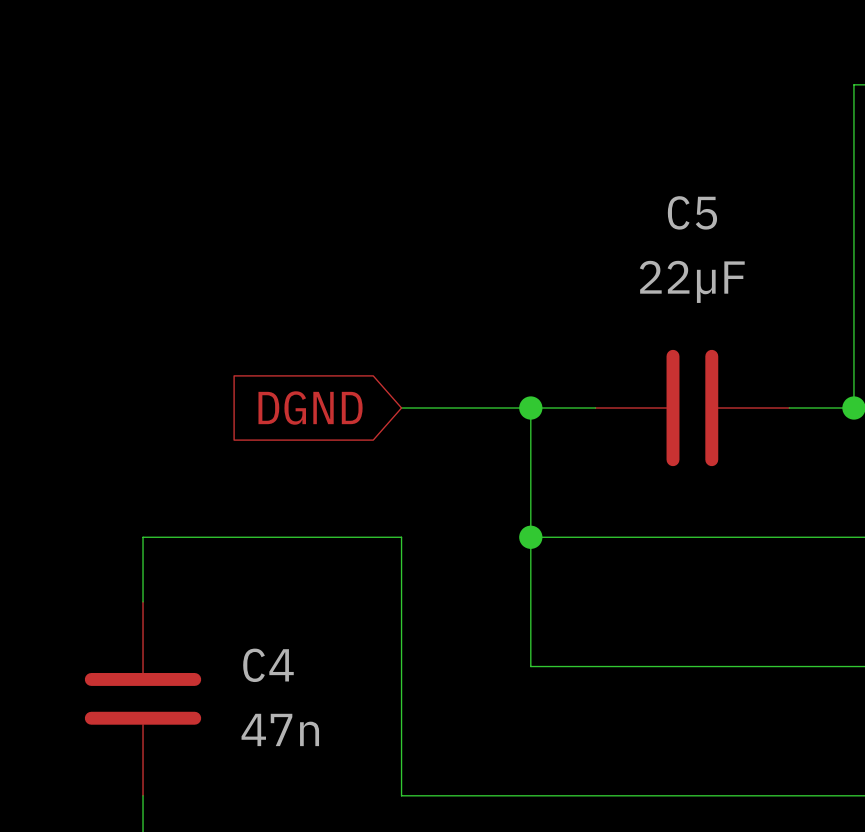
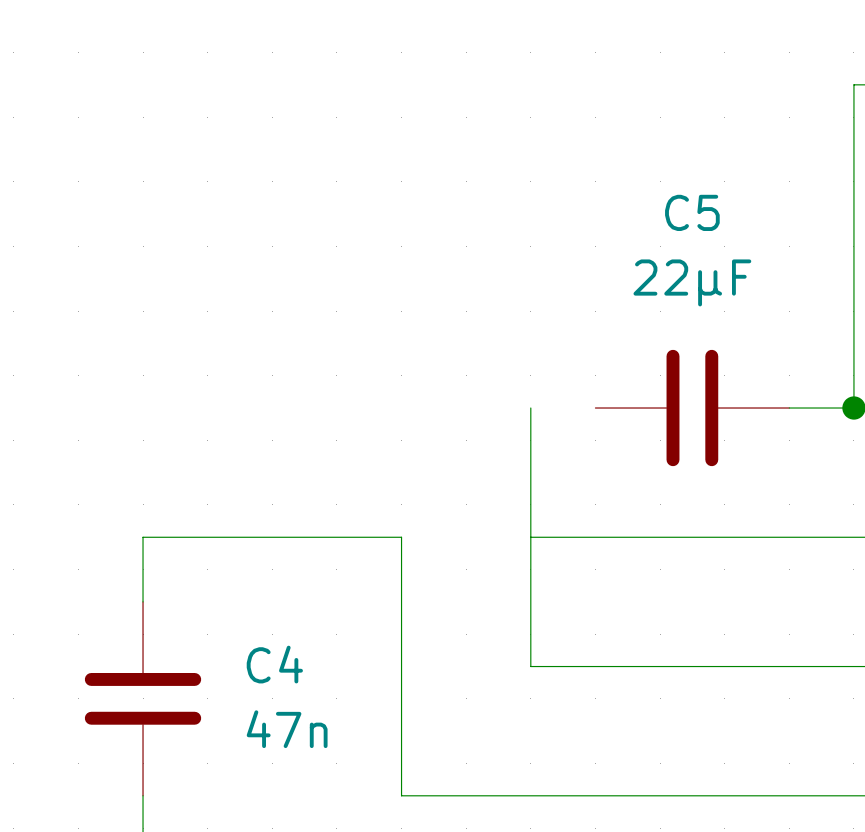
global label: DGND (310, 408) -> none
wire: (401, 408) (595, 408) -> none
junction: (530, 408) -> none
junction: (530, 537) -> none

